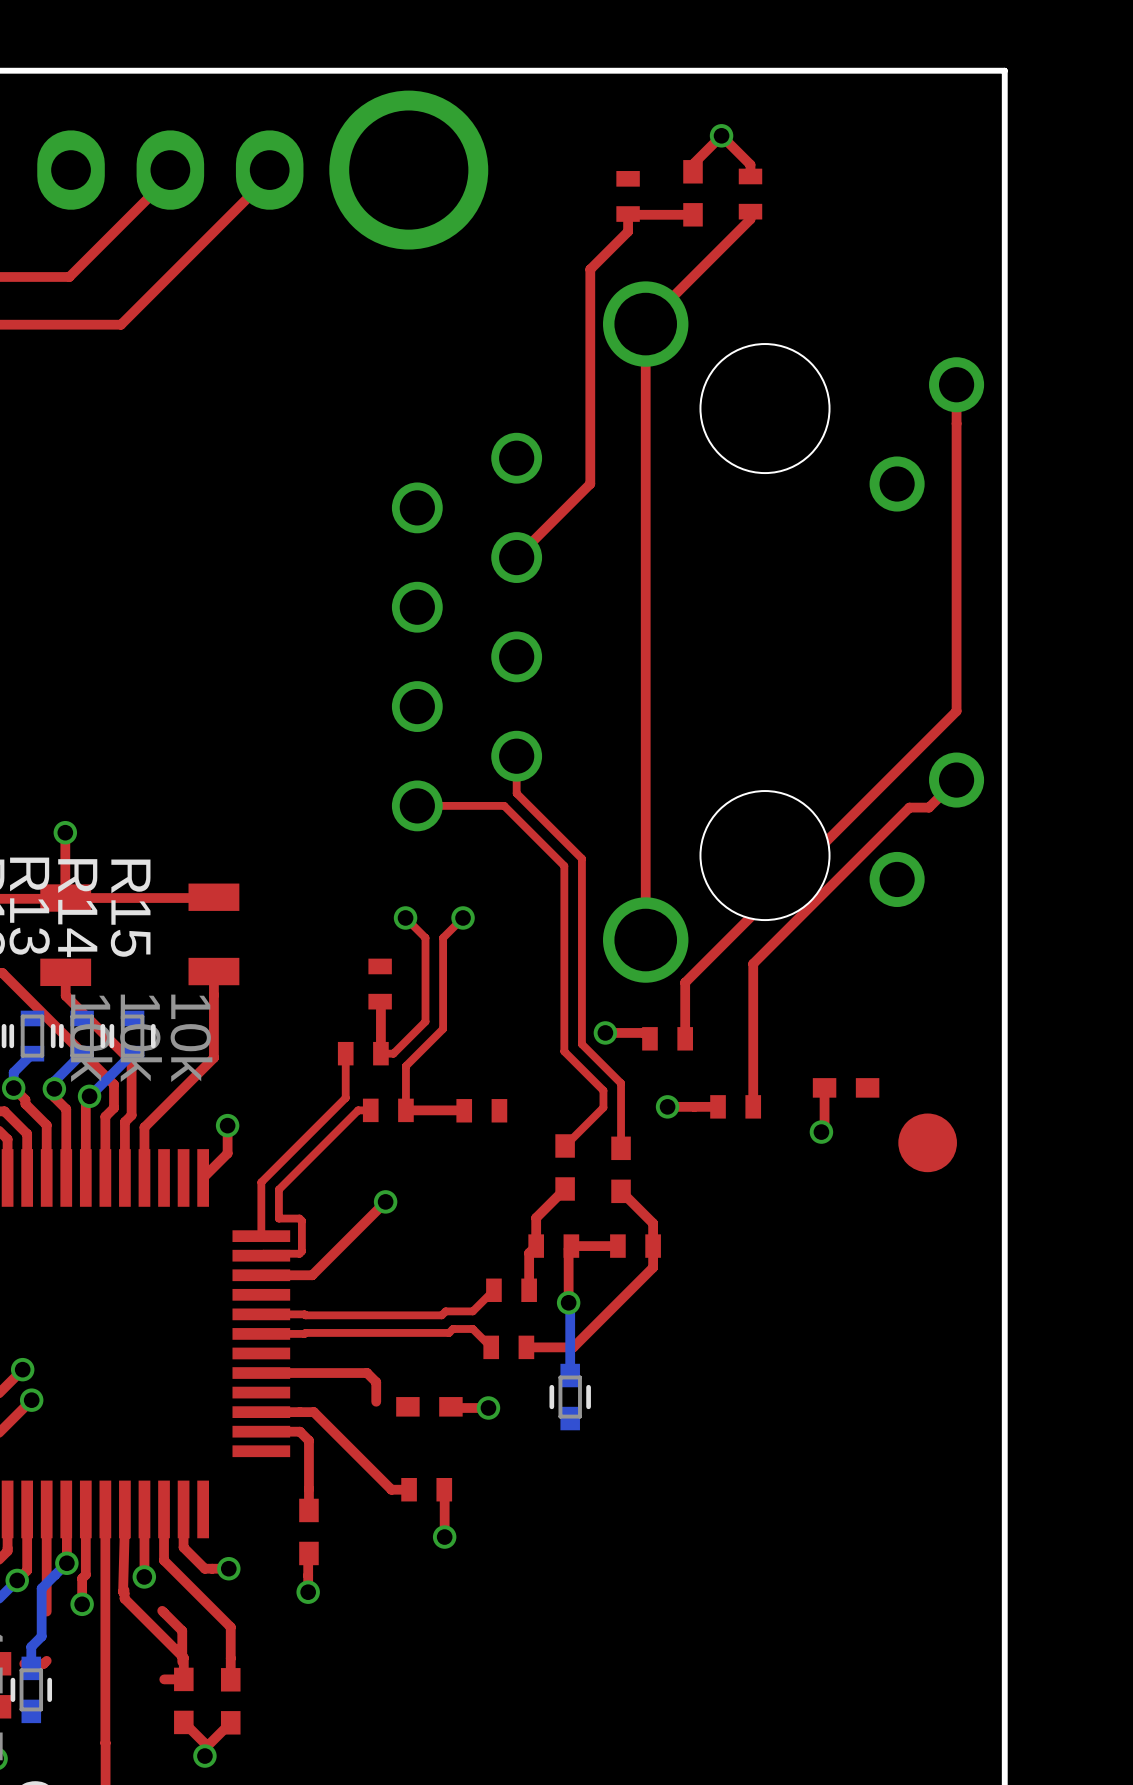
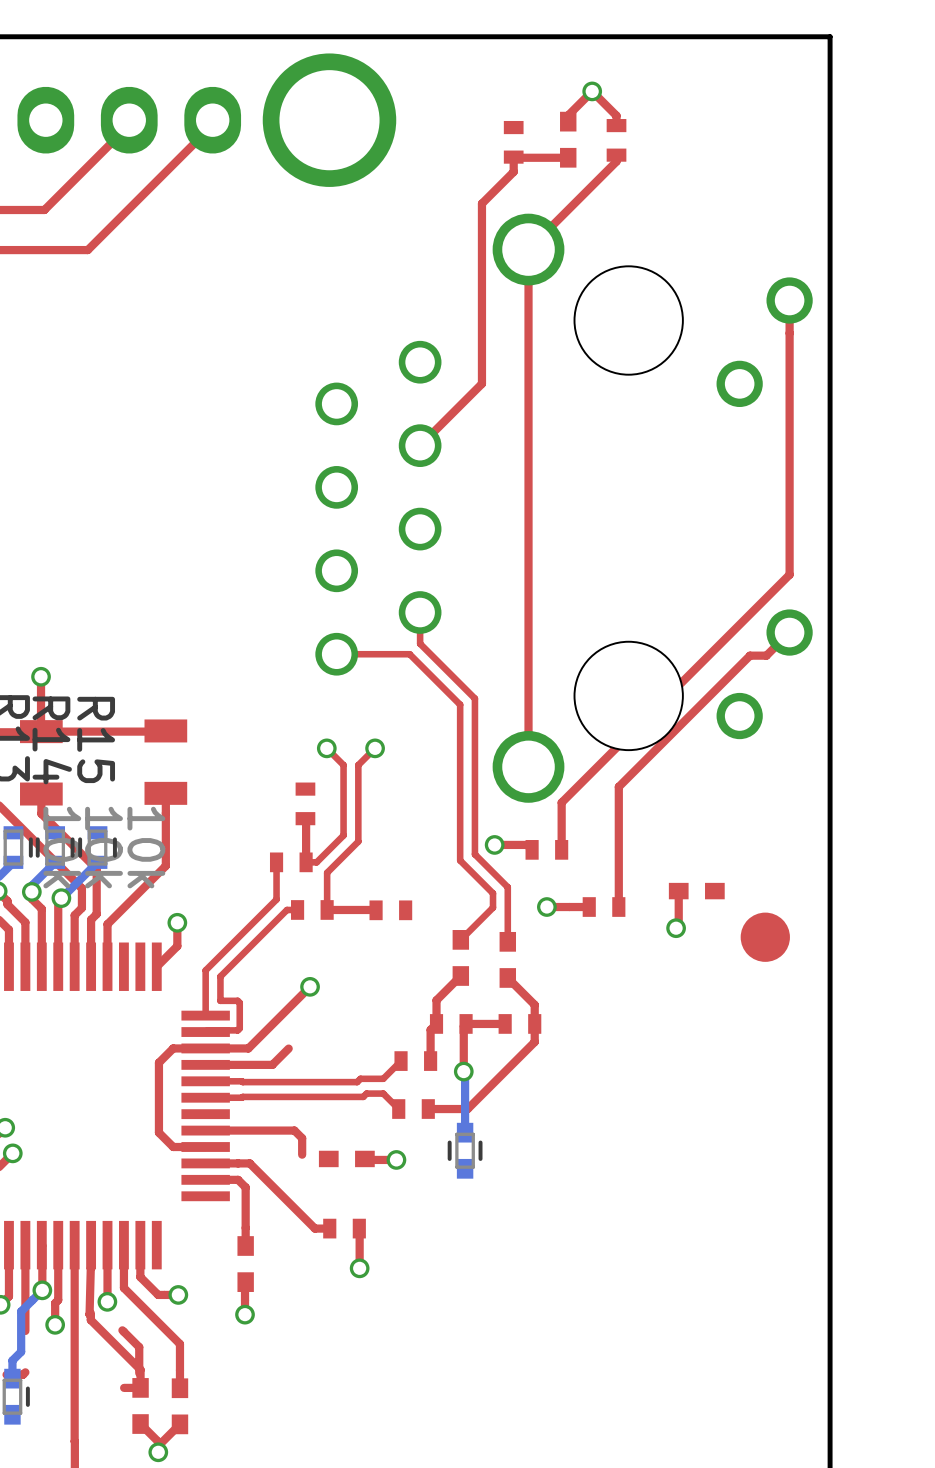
top track: none -> (205, 1048) (173, 1048) (158, 1062) (158, 1132) (173, 1147) (205, 1147)
top track: none -> (288, 1048) (272, 1064) (205, 1064)

